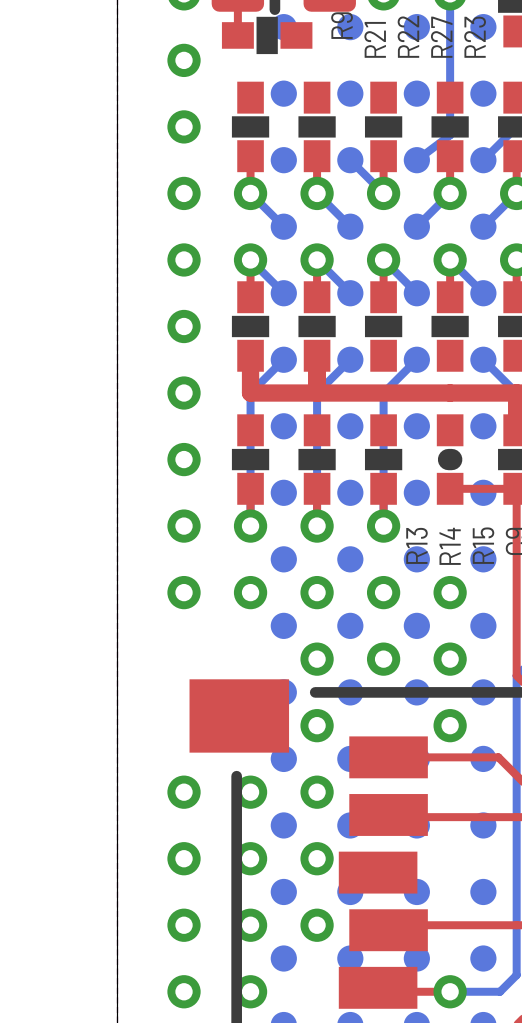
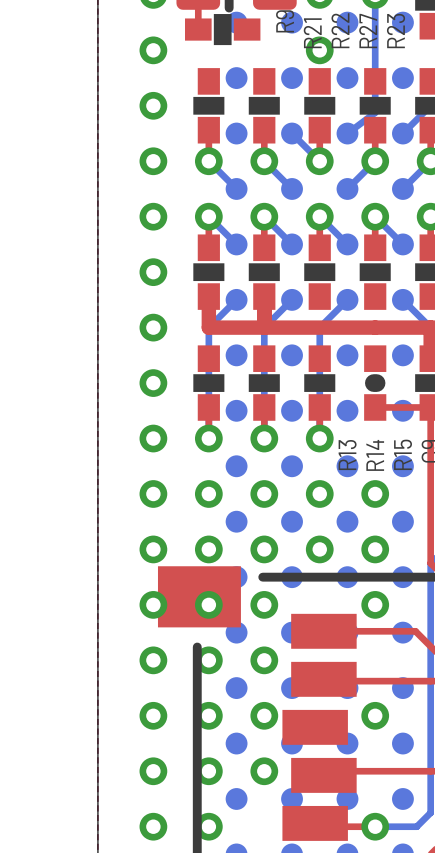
via: none -> (319, 50)
via: none -> (153, 549)
via: none -> (208, 549)
via: none -> (153, 604)
via: none -> (208, 604)
via: none -> (375, 715)

